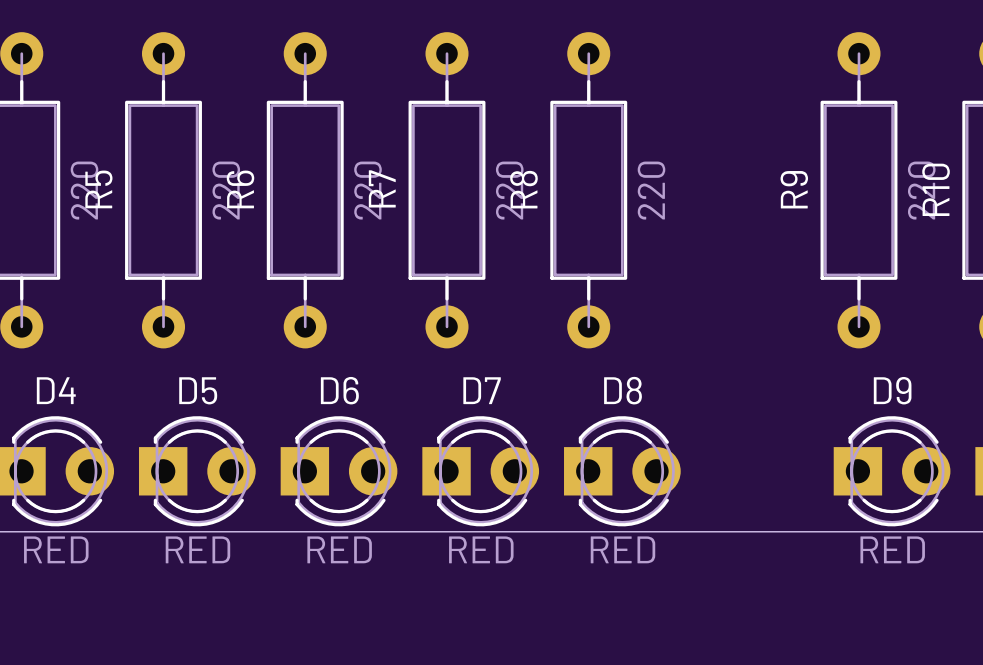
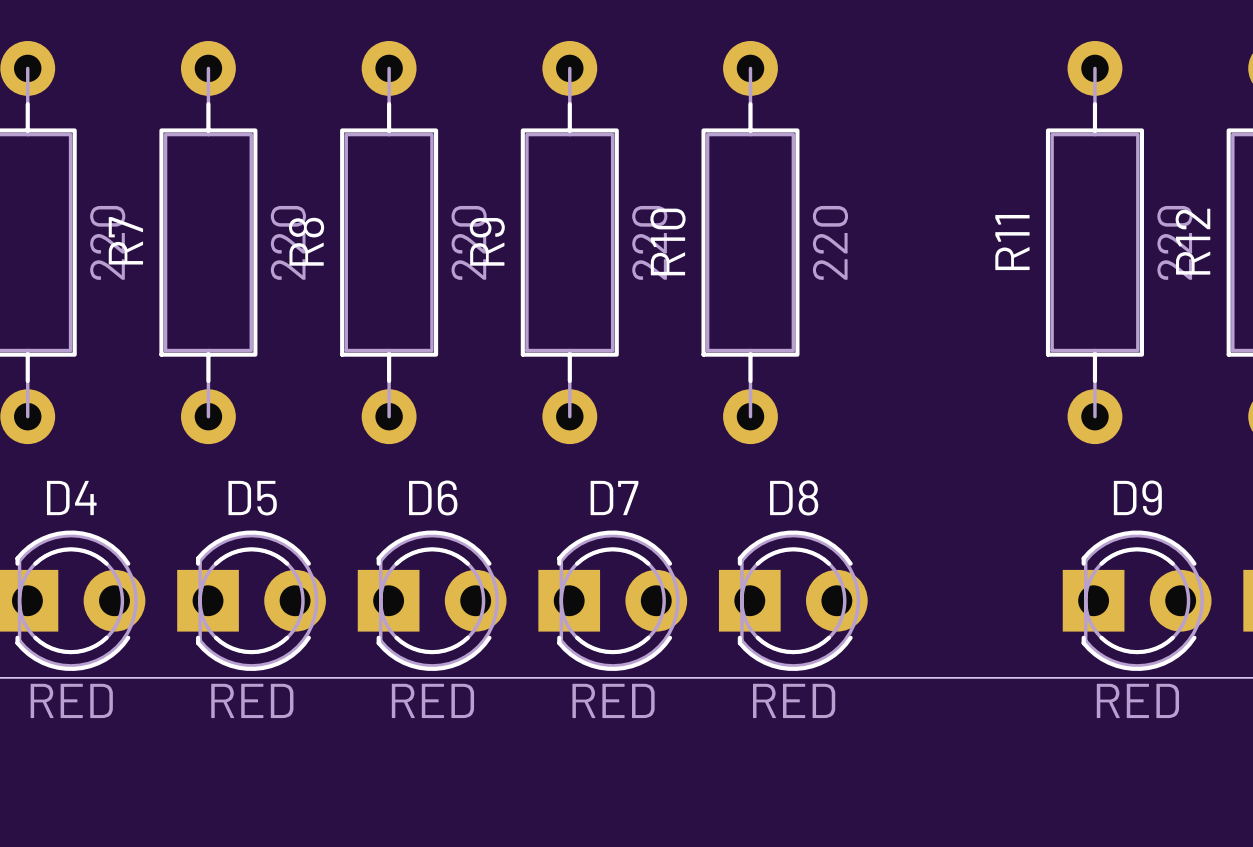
R7 name: R7 (382, 188) -> R9 (487, 241)
R5 name: R5 (98, 189) -> R7 (125, 240)
R6 name: R6 (240, 189) -> R8 (306, 241)
R8 name: R8 (523, 189) -> R10 (667, 241)
R9 name: R9 (794, 189) -> R11 (1012, 242)
R10 name: R10 (936, 189) -> R12 (1192, 241)

